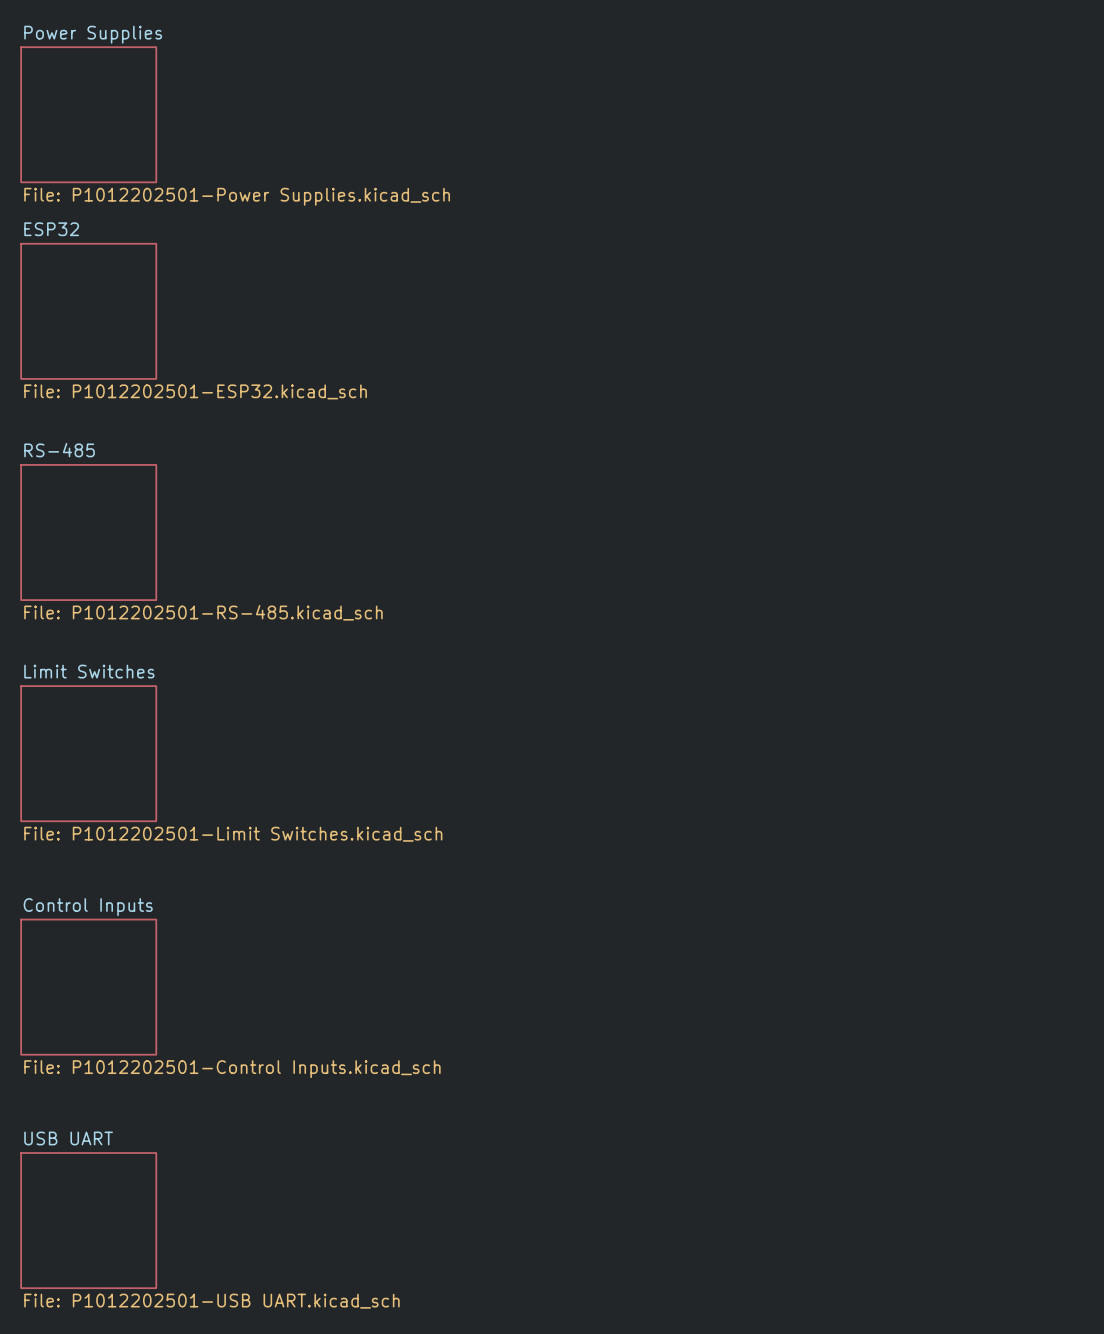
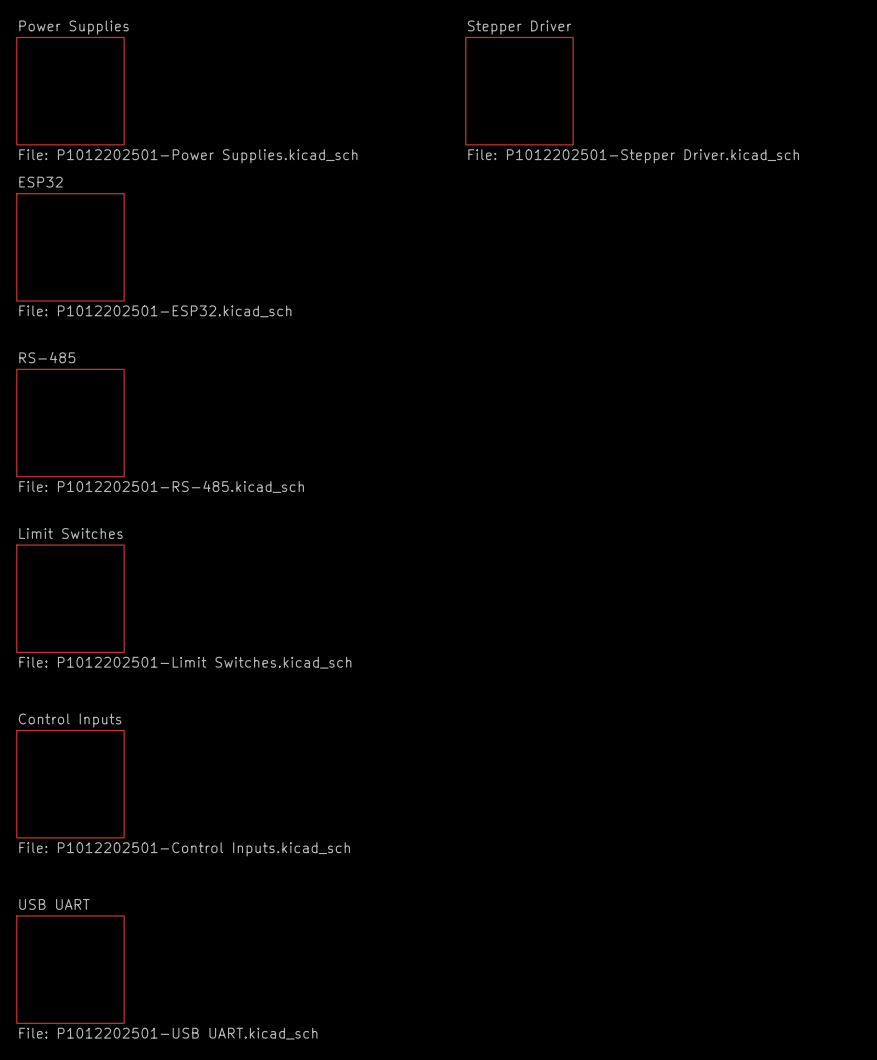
sheet Stepper Driver: none -> File: P1012202501-Stepper Driver.kicad_sch (519, 91)

